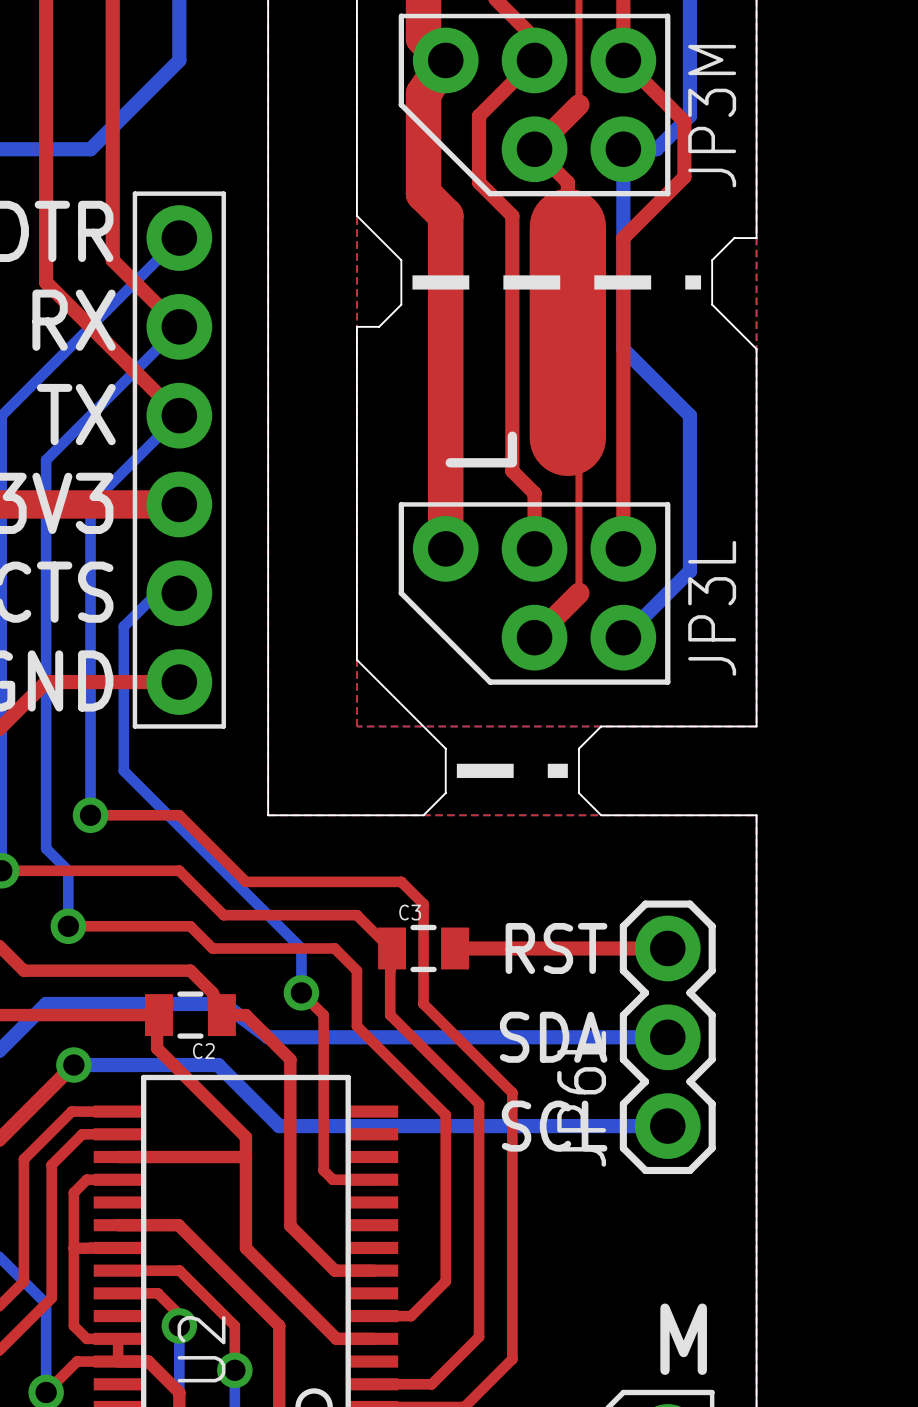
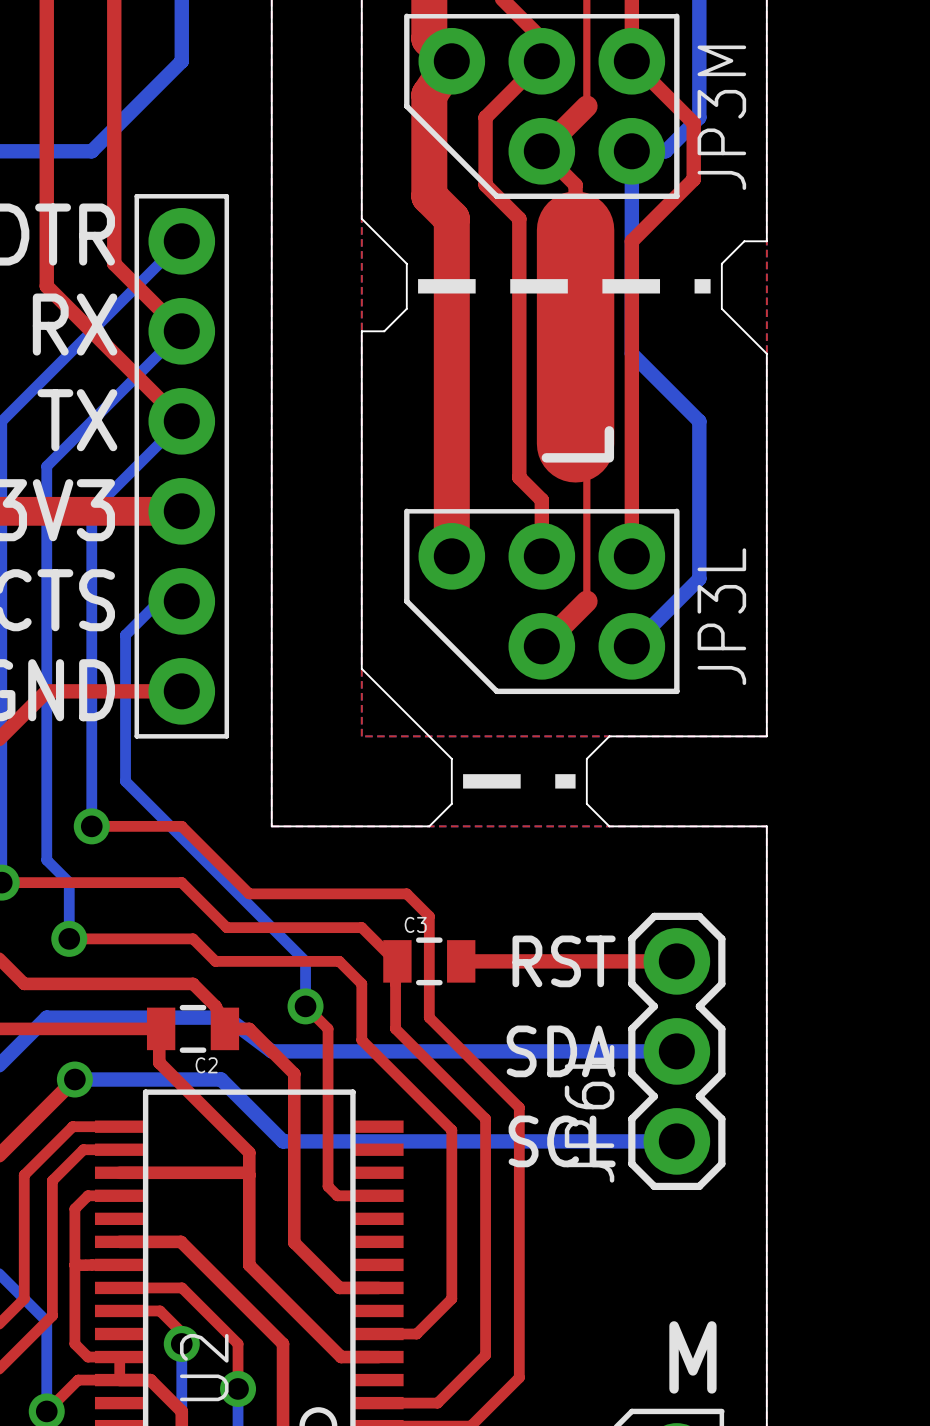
text position: L (481, 449) -> L (577, 444)

